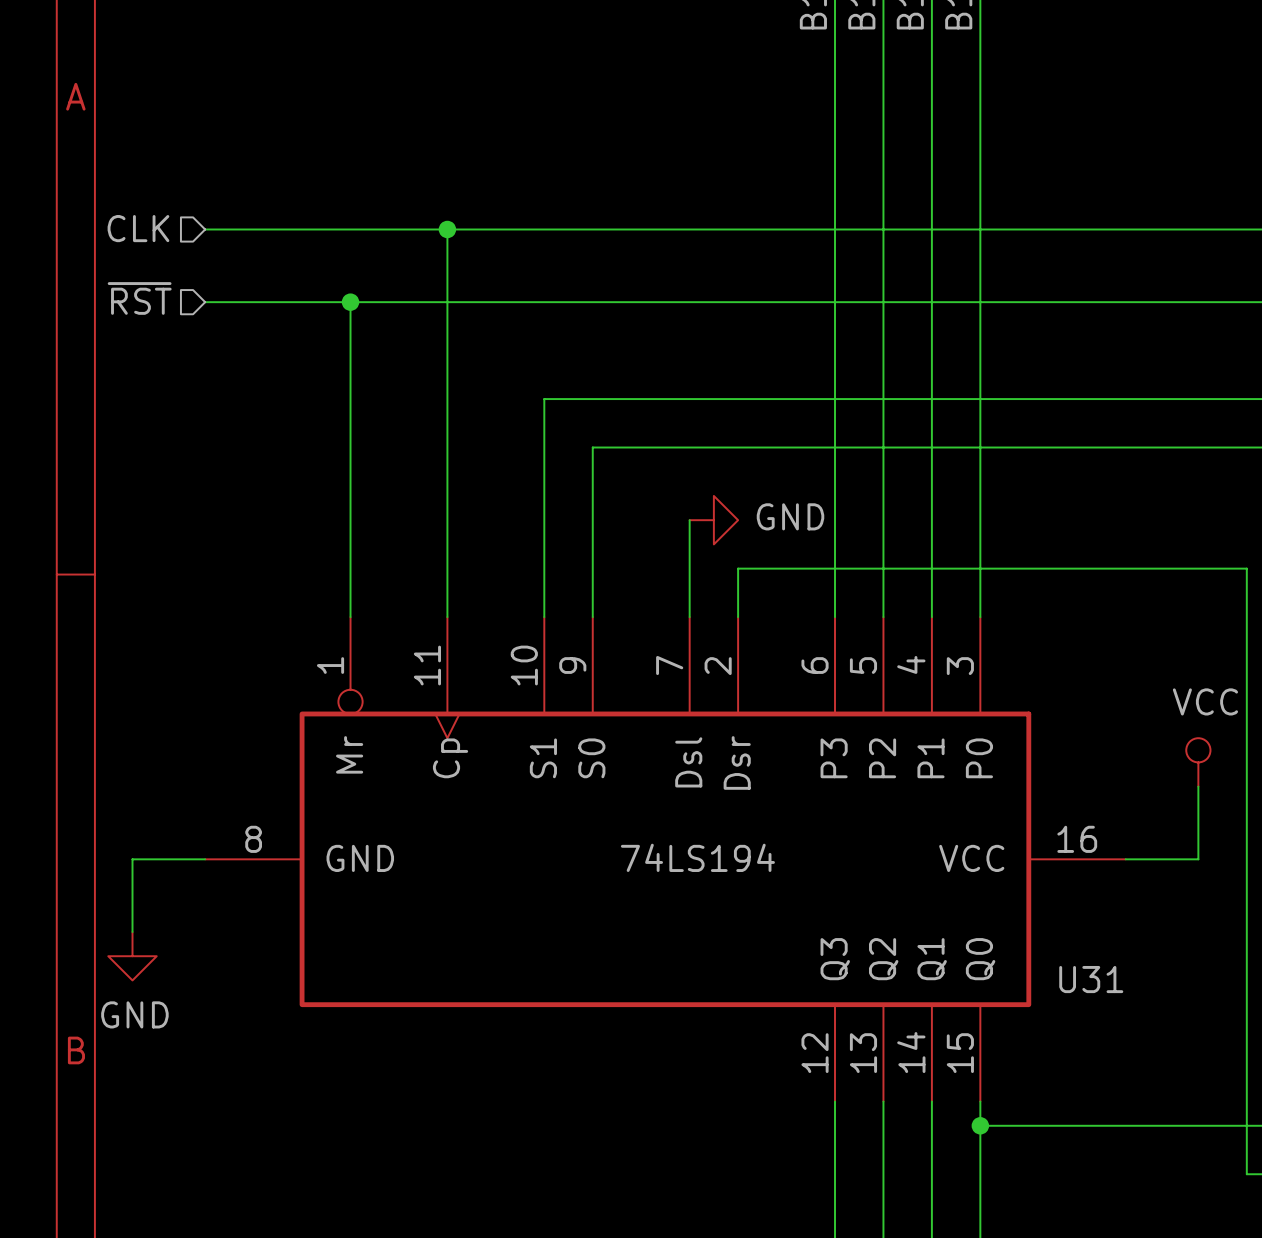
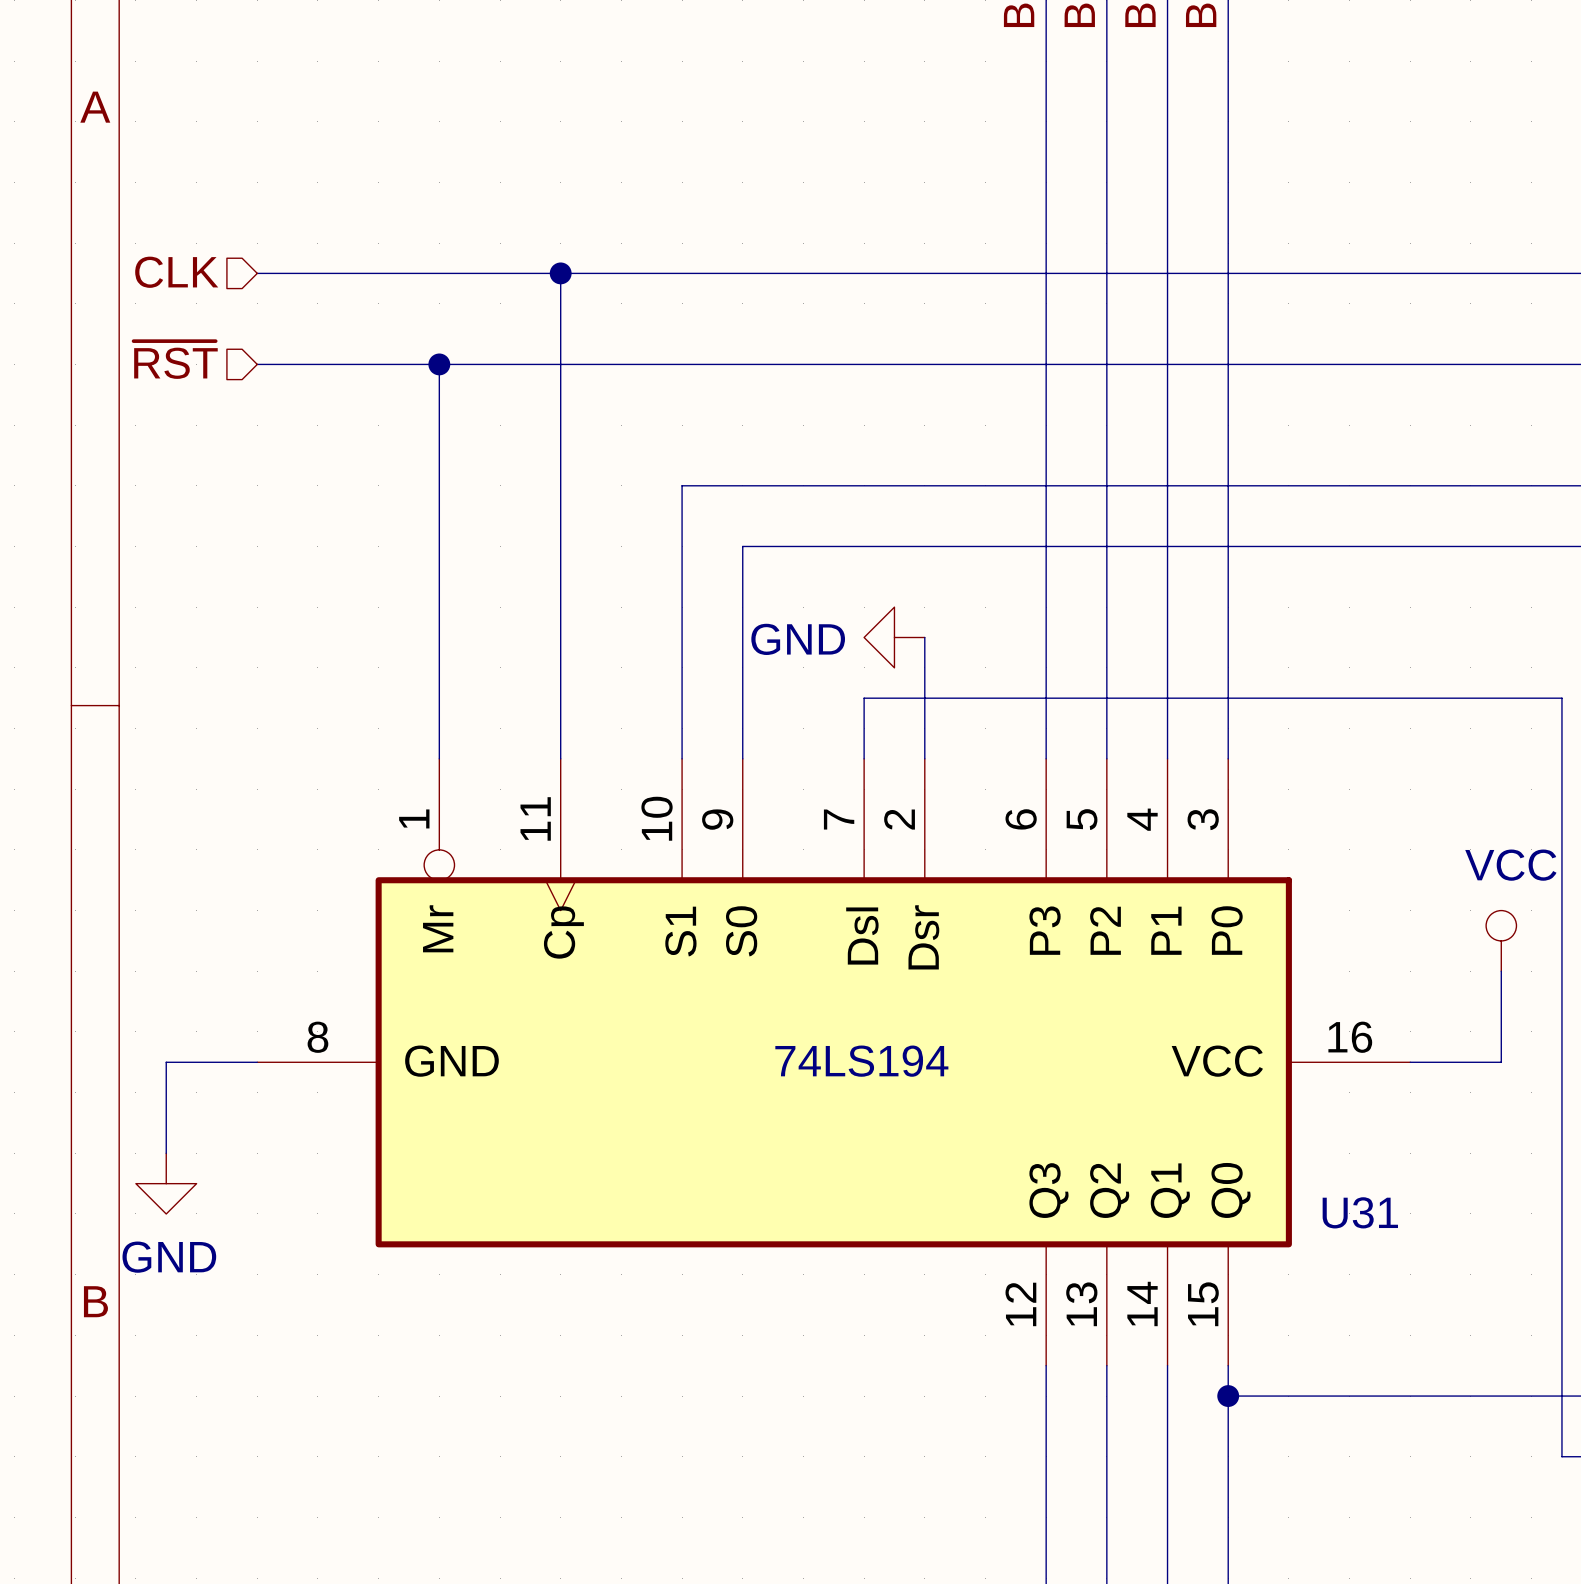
wire: (689, 520) (689, 568) -> (924, 637) (924, 698) (864, 698)
power symbol rotation: 0° (713, 520) -> 180° (894, 637)

